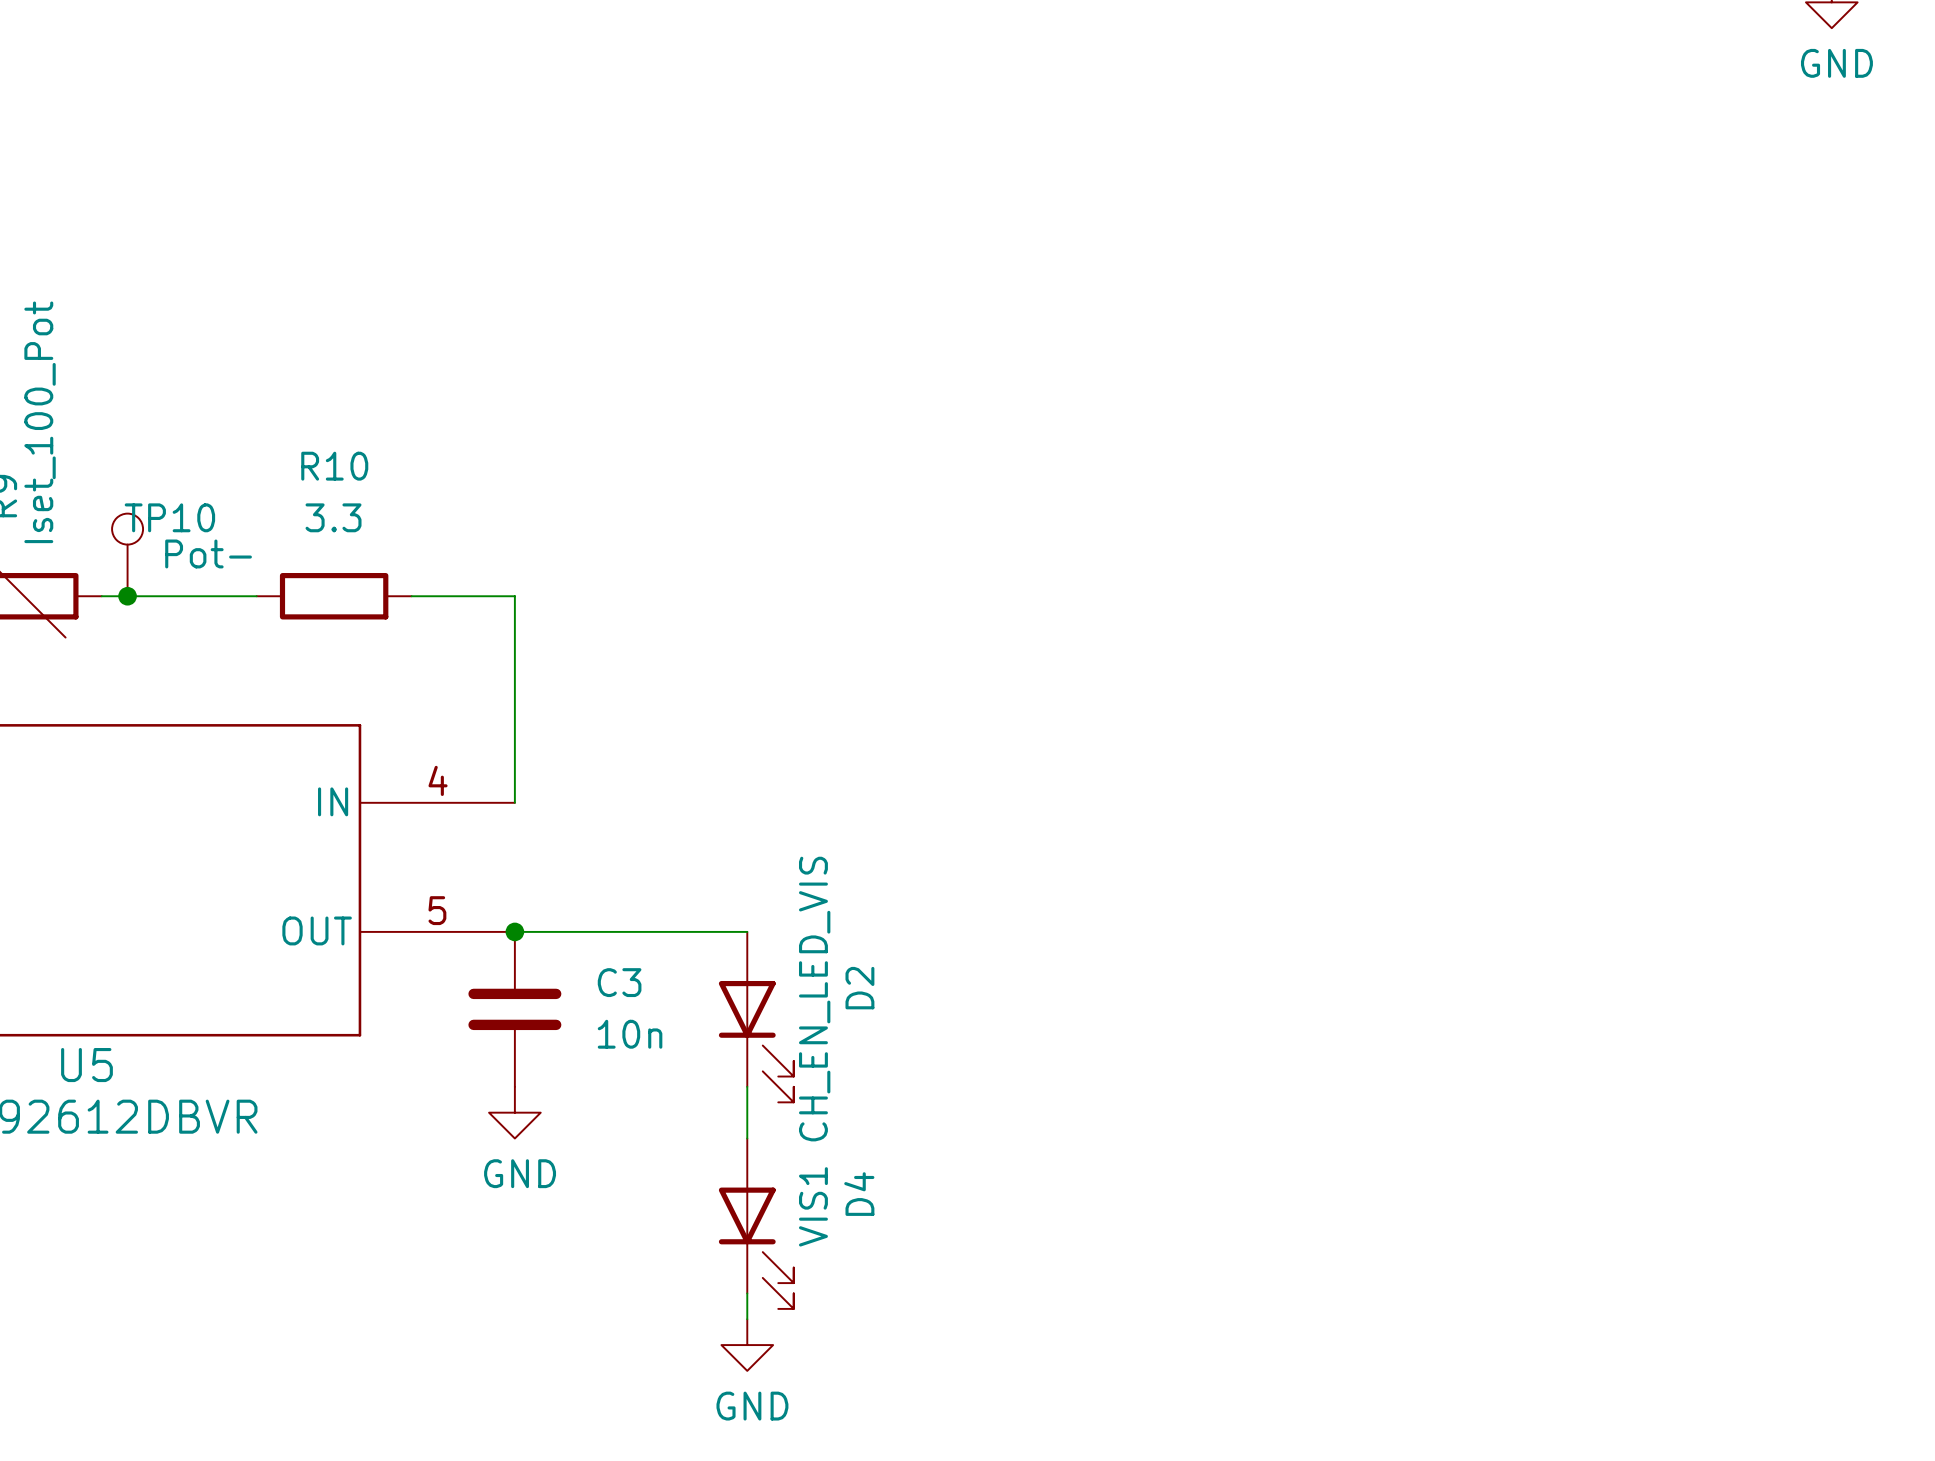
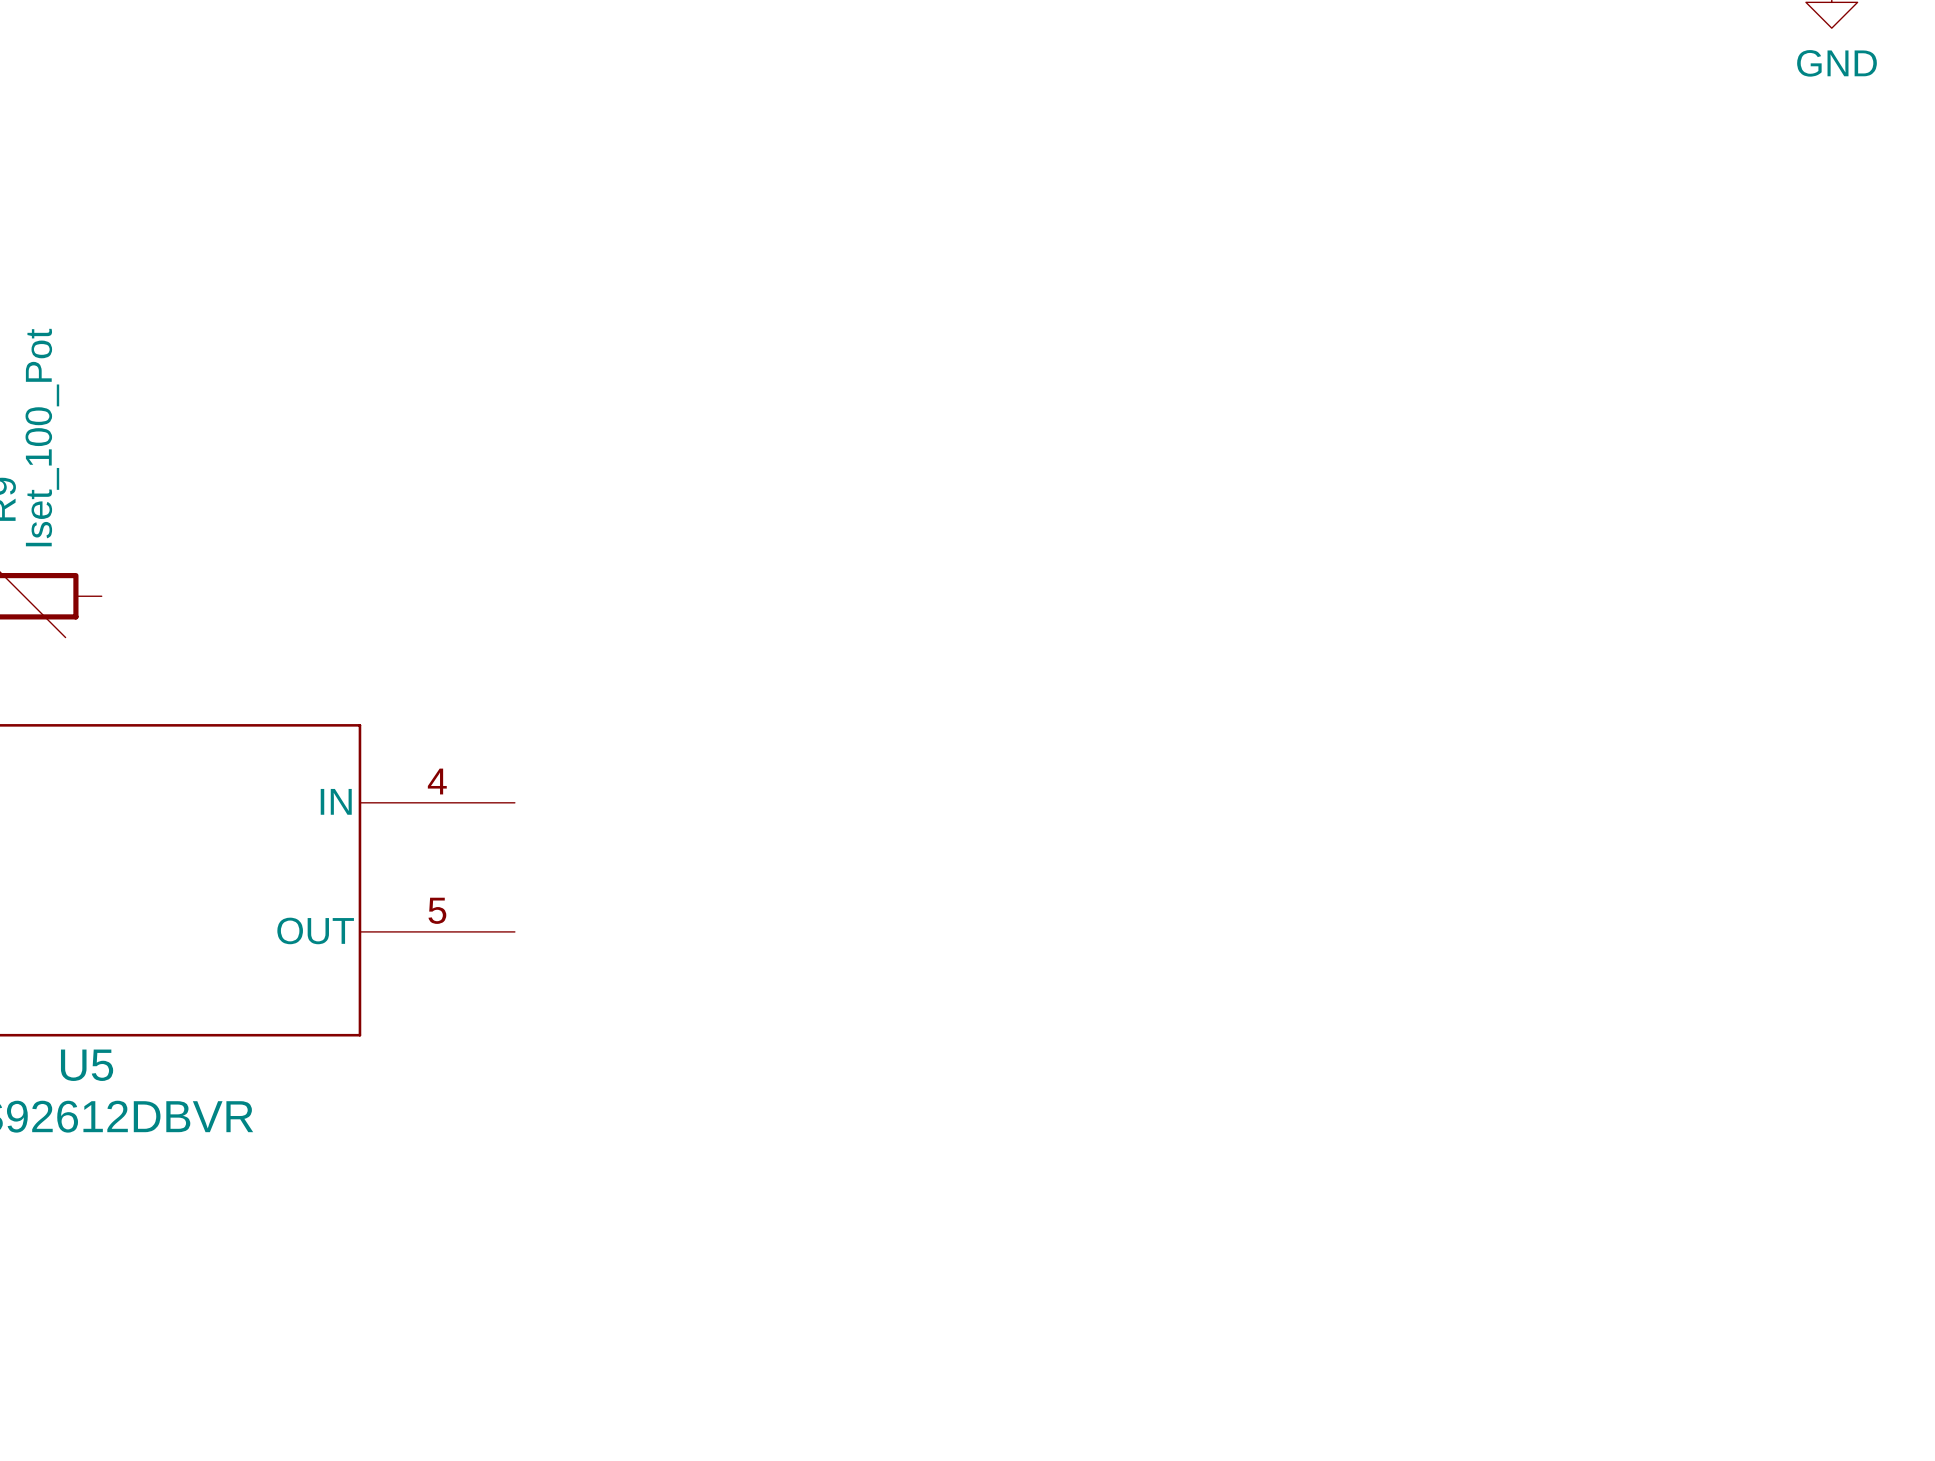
TP10: Pot- (127, 554) -> none
wire: (101, 596) (256, 596) -> none
junction: (127, 596) -> none
R10: 3.3 (334, 596) -> none
wire: (411, 596) (514, 596) (514, 802) -> none
wire: (514, 931) (747, 931) -> none
junction: (514, 931) -> none
C3: 10n (514, 1009) -> none
D2: CH_EN_LED_VIS (756, 1017) -> none
wire: (747, 1086) (747, 1138) -> none
power symbol: GND (514, 1112) -> none
D4: VIS1 (756, 1223) -> none
wire: (747, 1293) (747, 1319) -> none
power symbol: GND (747, 1345) -> none

